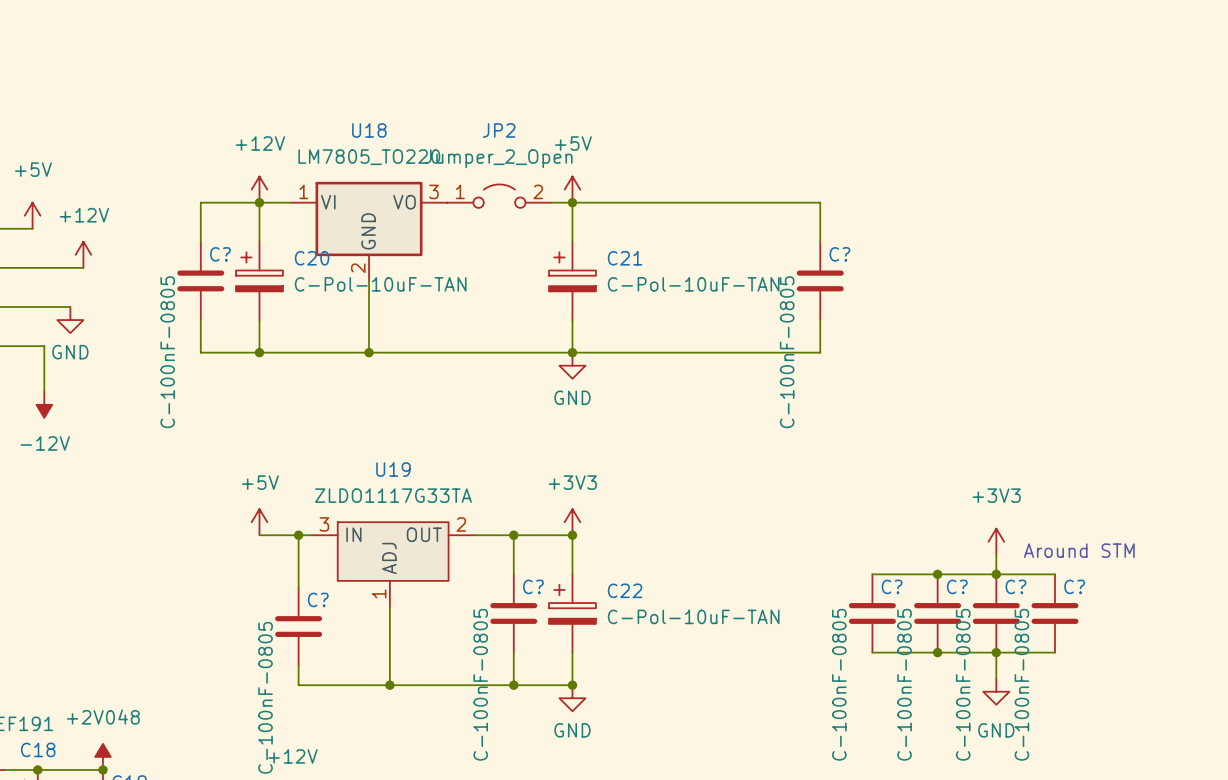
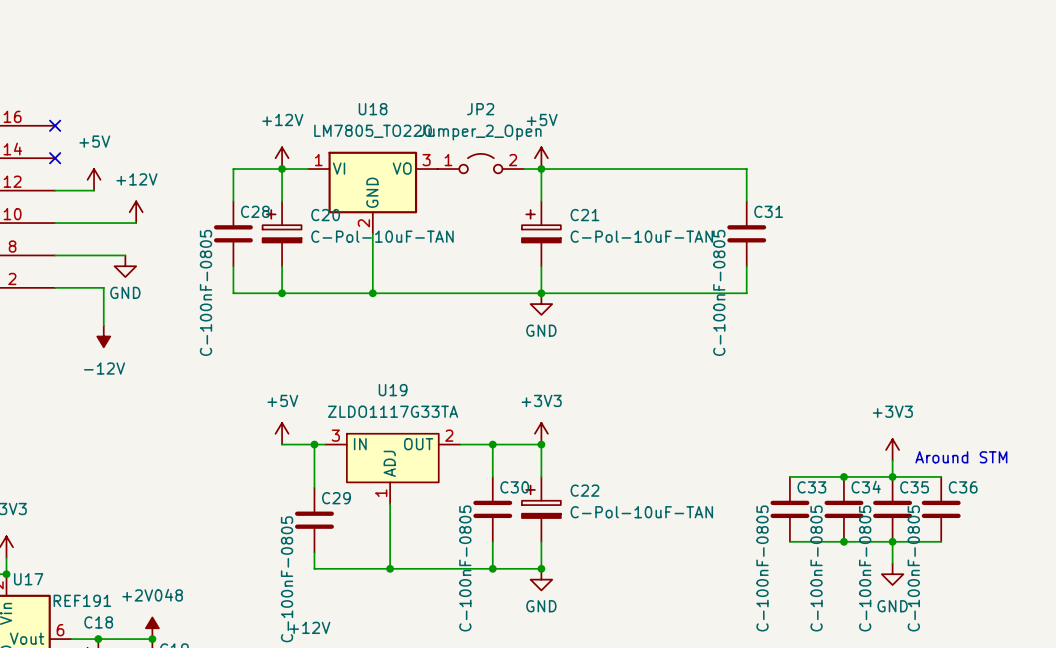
C? name: C? (220, 254) -> C28 (255, 211)
C? name: C? (839, 254) -> C31 (768, 211)
C? name: C? (533, 586) -> C30 (514, 487)
C? name: C? (892, 586) -> C33 (811, 487)
C? name: C? (957, 586) -> C34 (866, 487)
C? name: C? (1015, 586) -> C35 (914, 487)
C? name: C? (1074, 586) -> C36 (963, 487)
C? name: C? (318, 599) -> C29 (336, 498)

